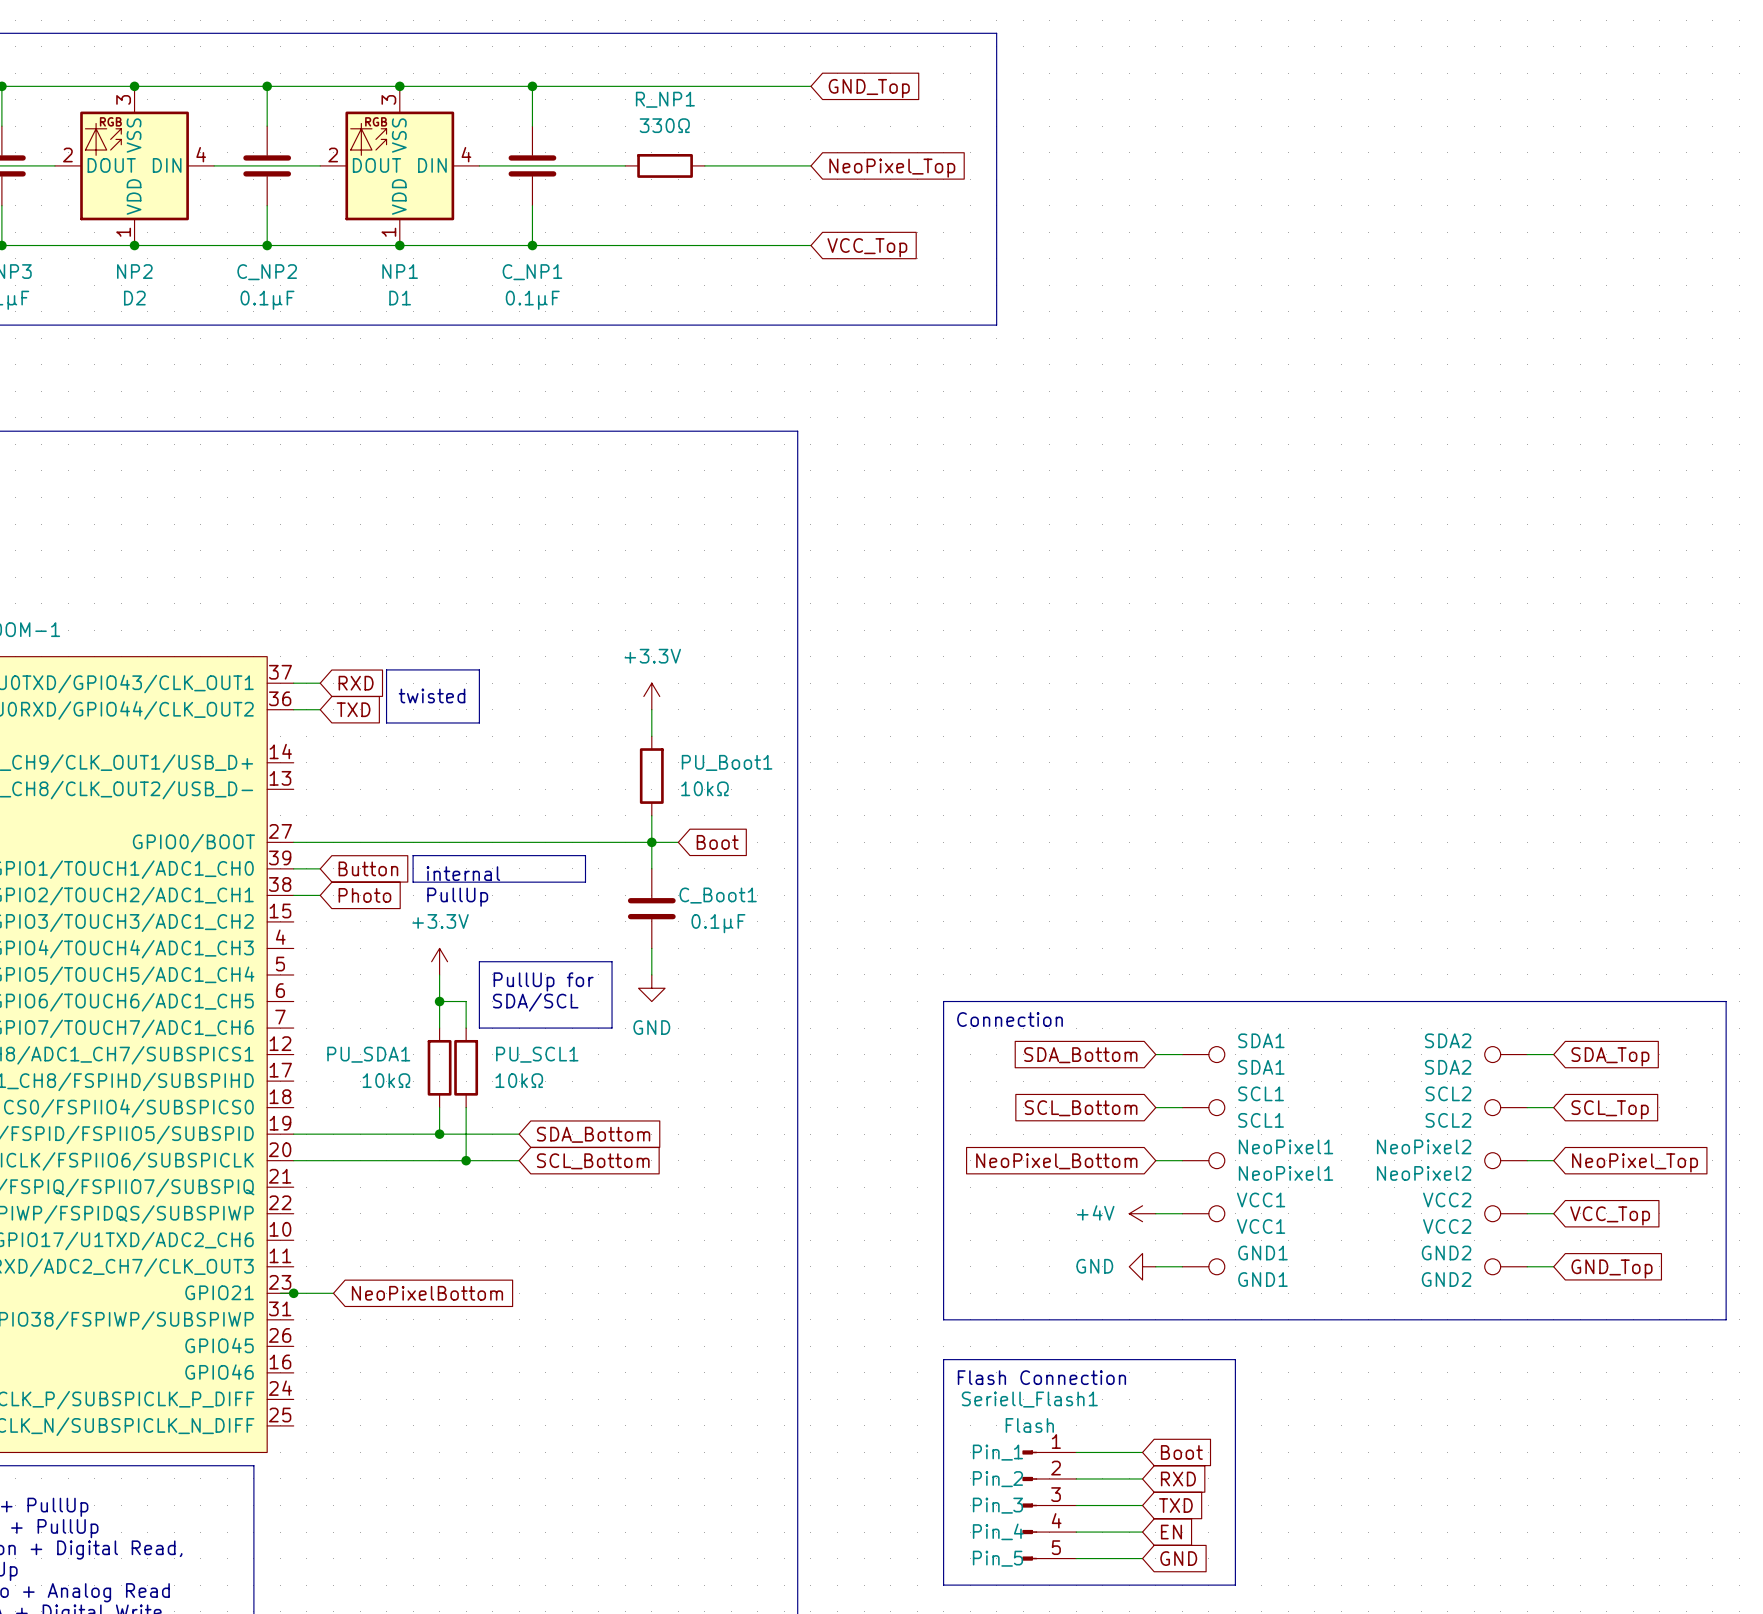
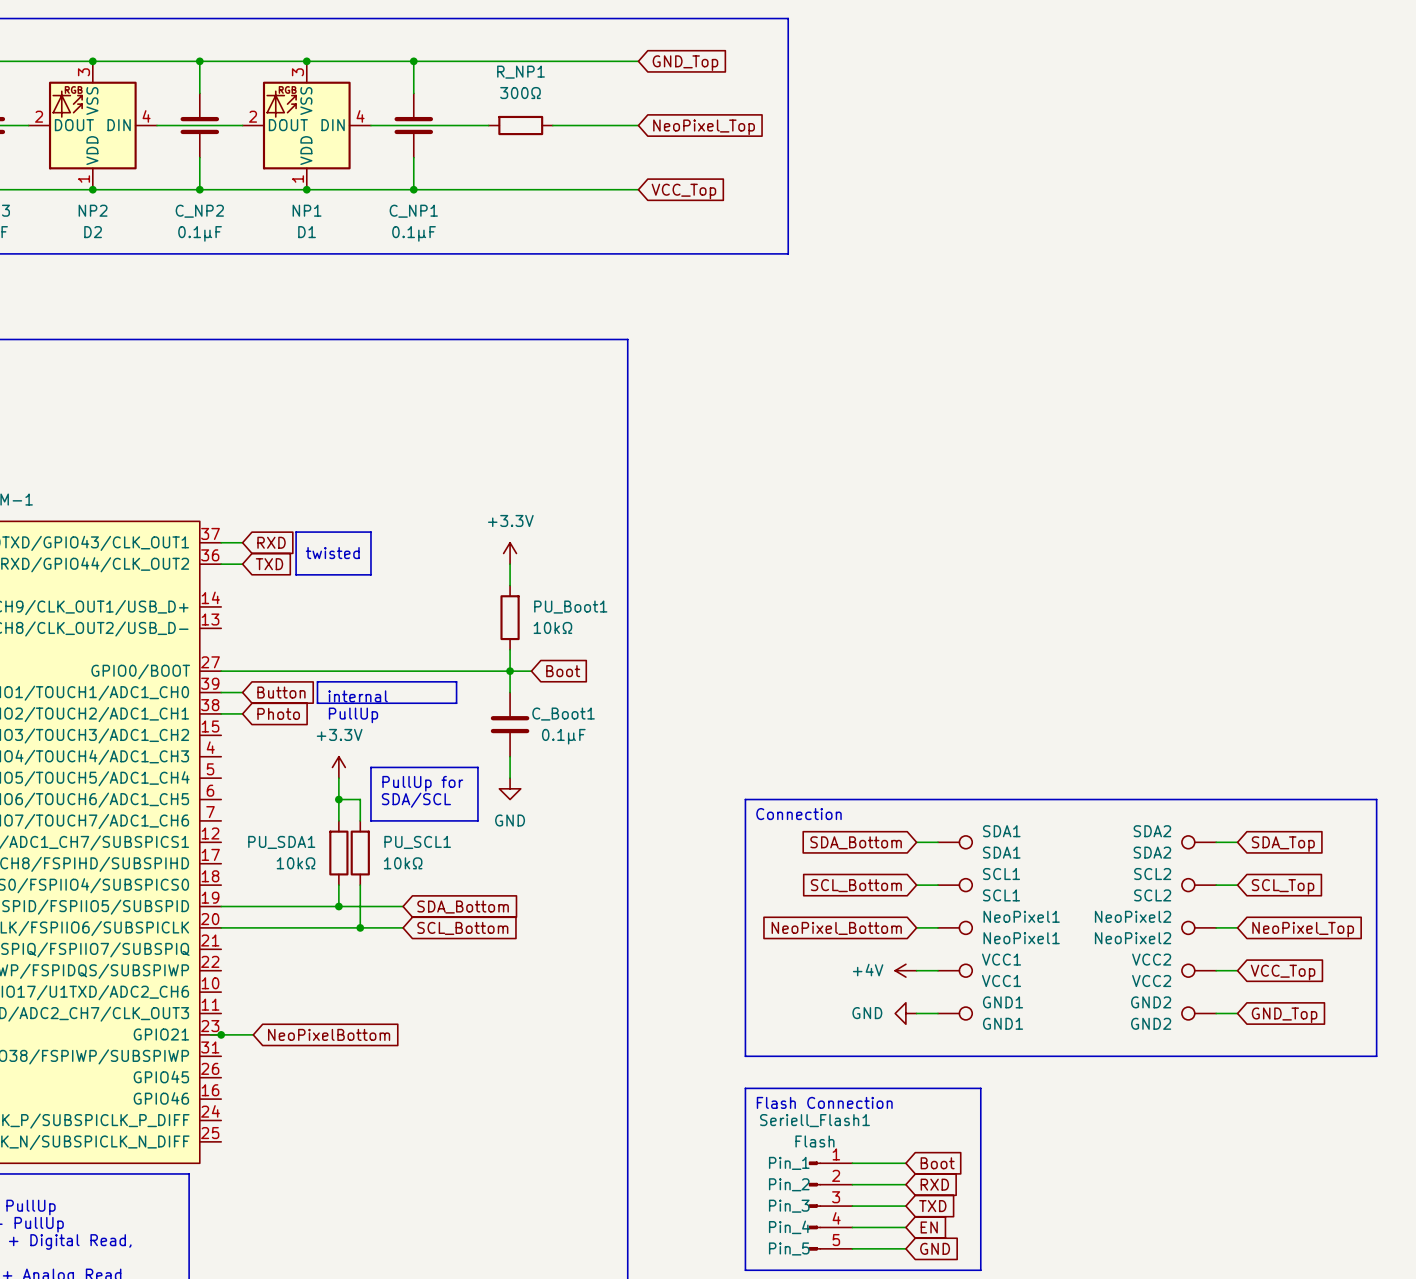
R_NP1 value: 330Ω (664, 125) -> 300Ω (520, 93)

